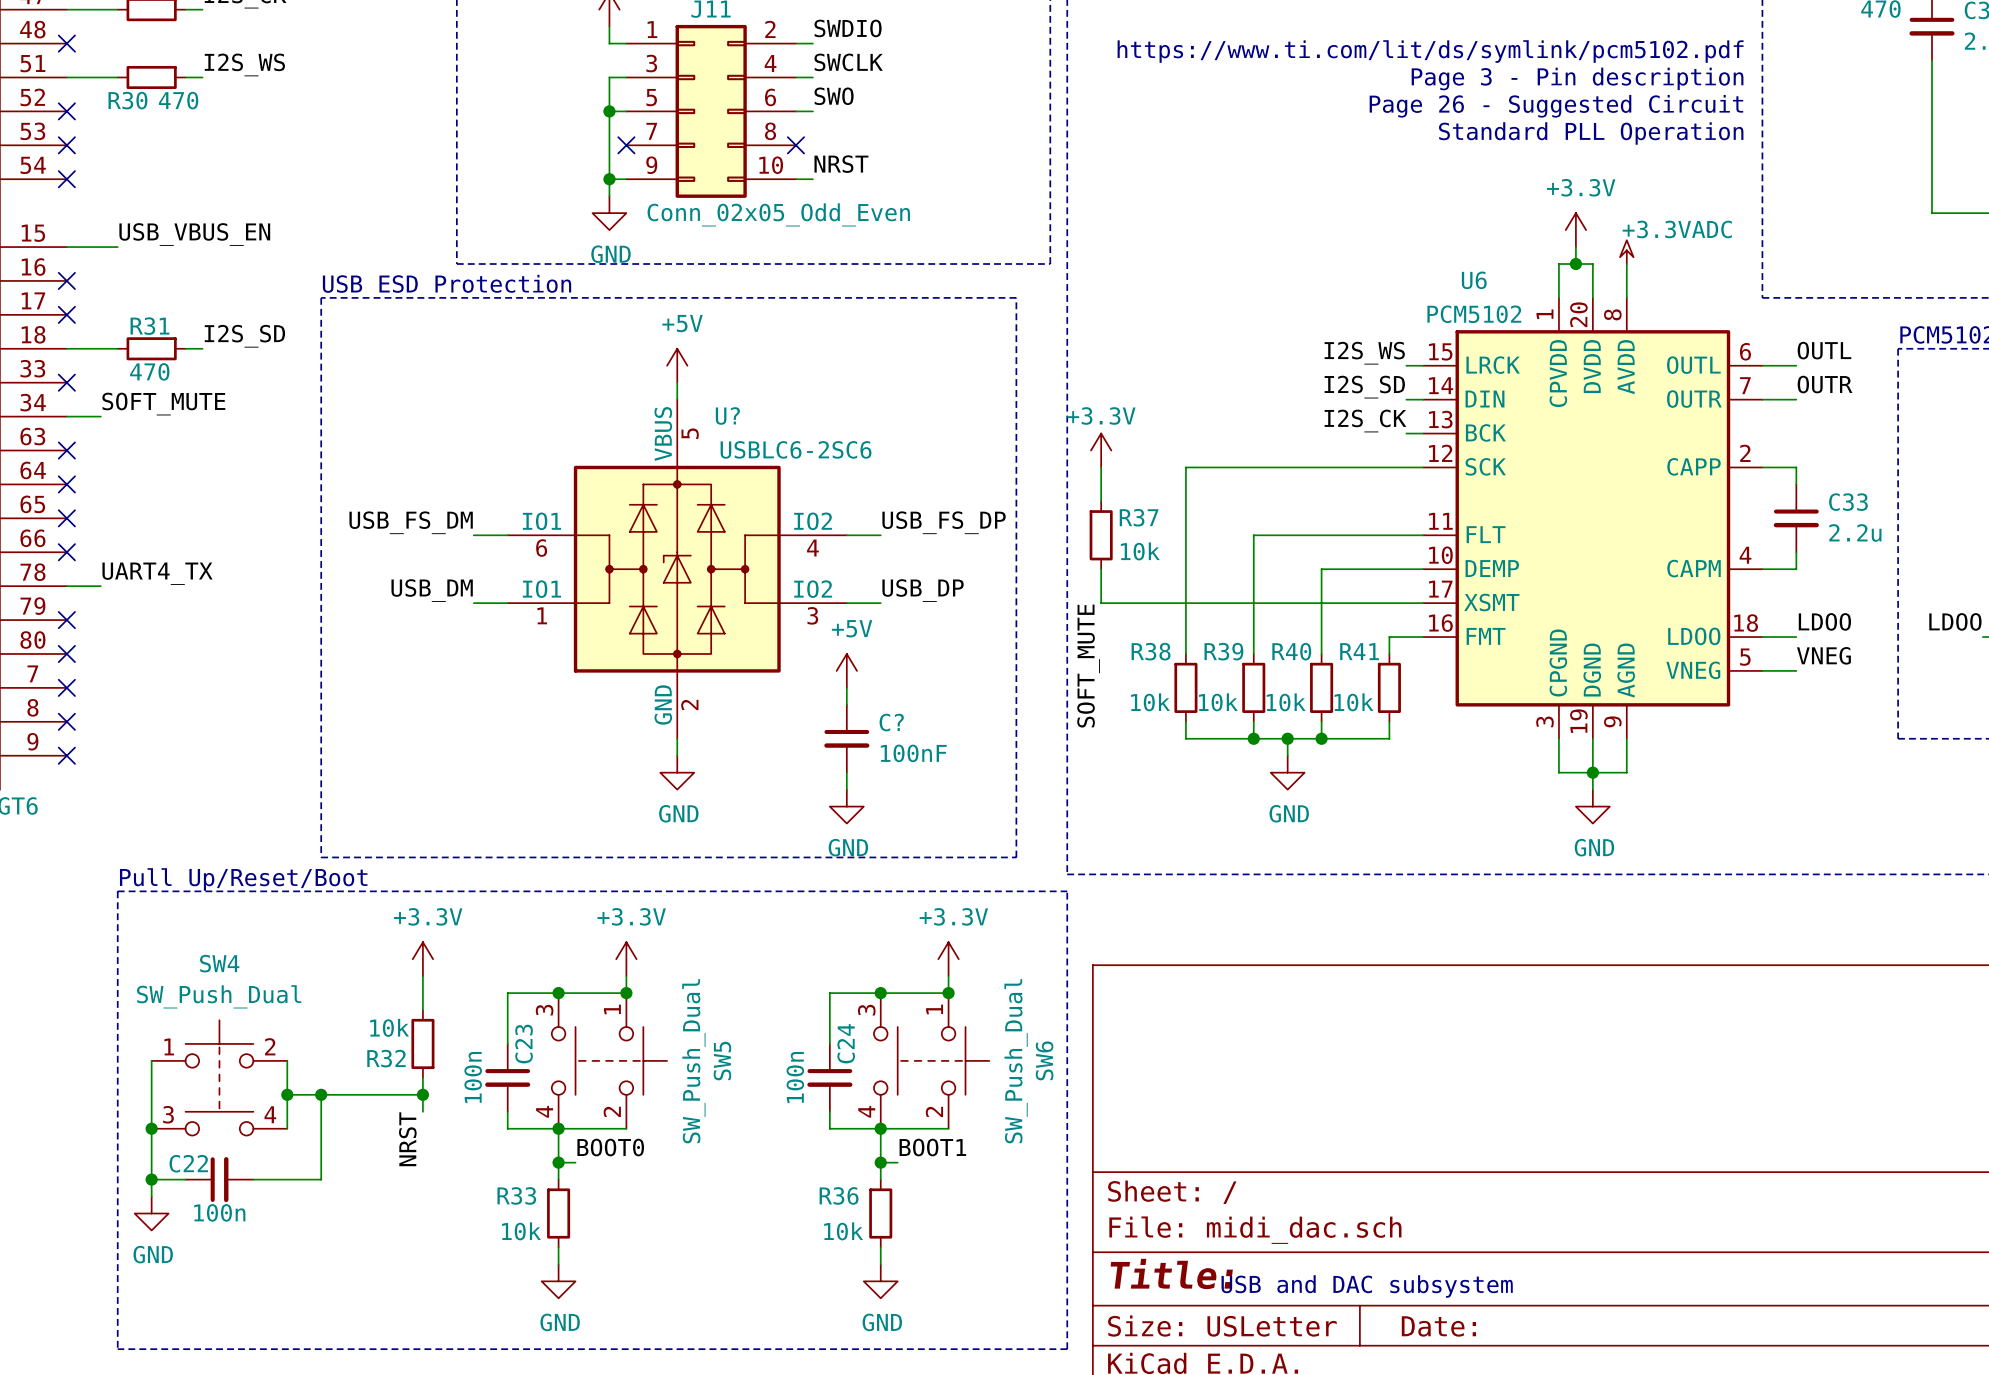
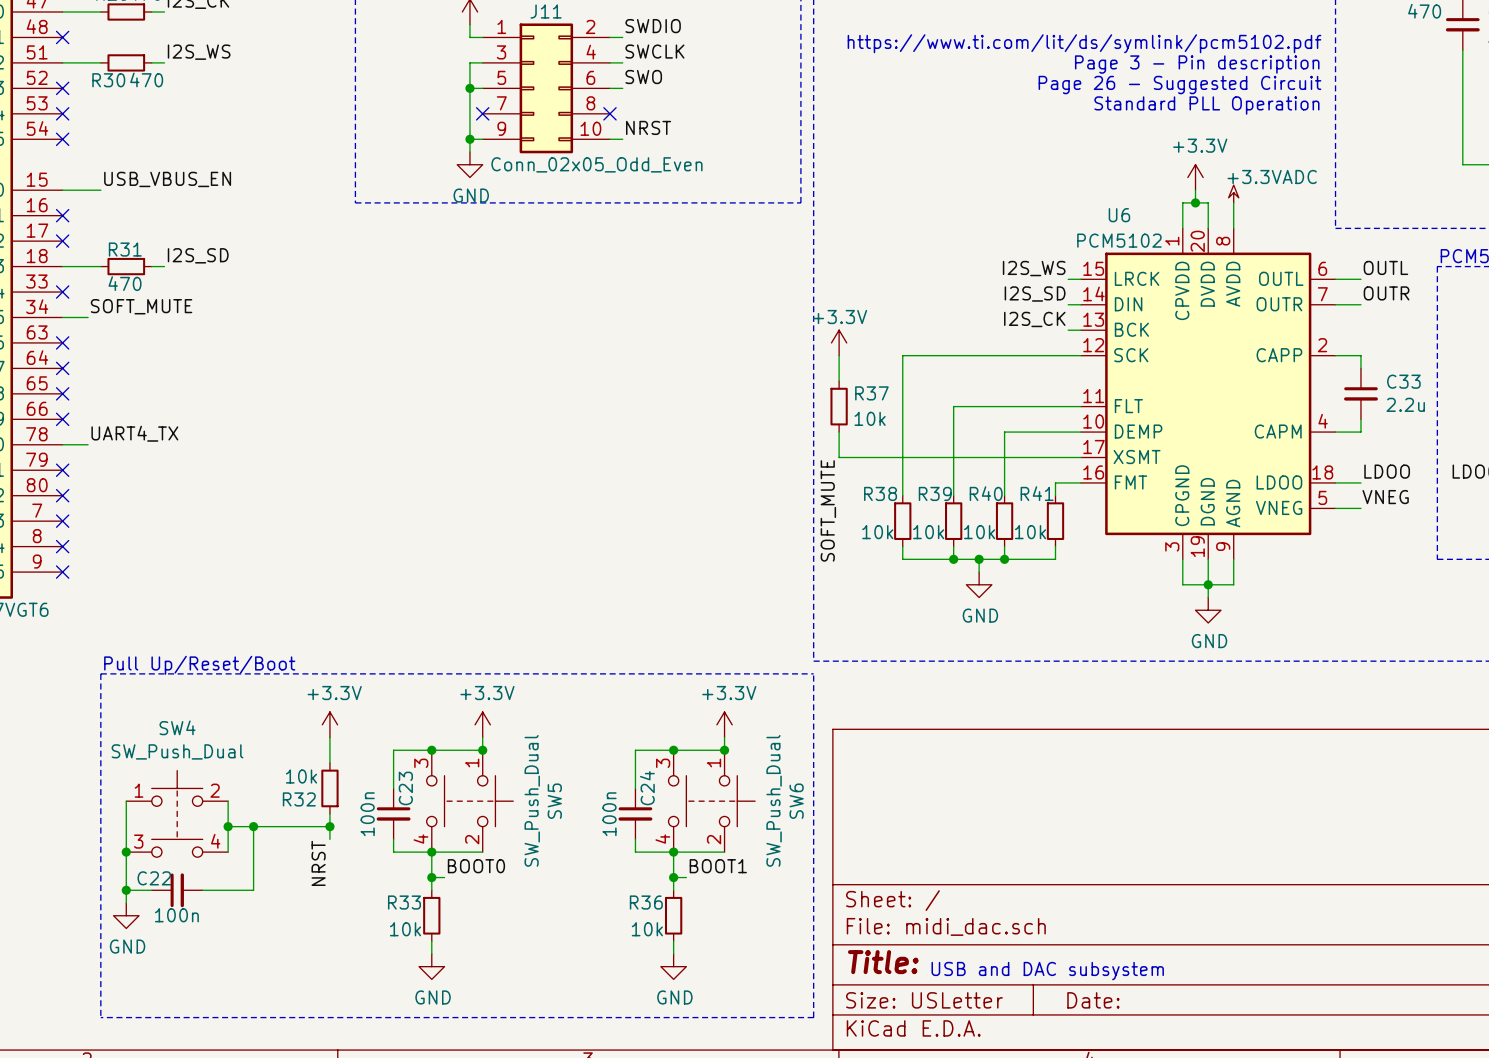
text: USB ESD Protection (447, 283) -> none
line: (321, 297) (1016, 297) (1016, 857) (321, 857) (321, 297) -> none
power symbol: +5V (677, 365) -> none
wire: (677, 382) (677, 399) -> none
label: USB_FS_DM (411, 522) -> none
label: USB_FS_DP (944, 522) -> none
wire: (473, 535) (507, 535) -> none
wire: (846, 535) (880, 535) -> none
U?: USBLC6-2SC6 (677, 569) -> none
label: USB_DM (432, 590) -> none
label: USB_DP (923, 590) -> none
wire: (473, 603) (507, 603) -> none
wire: (846, 603) (880, 603) -> none
power symbol: +5V (846, 670) -> none
wire: (846, 687) (846, 704) -> none
wire: (677, 738) (677, 755) -> none
C?: 100nF (846, 738) -> none
power symbol: GND (677, 772) -> none
wire: (846, 772) (846, 789) -> none
power symbol: GND (846, 806) -> none

